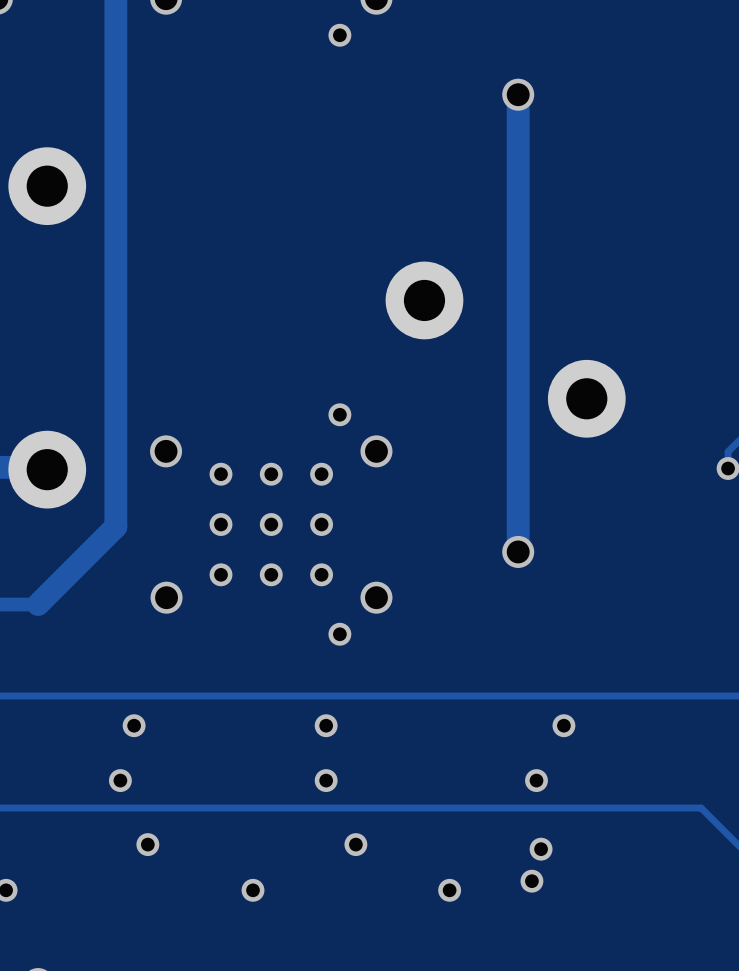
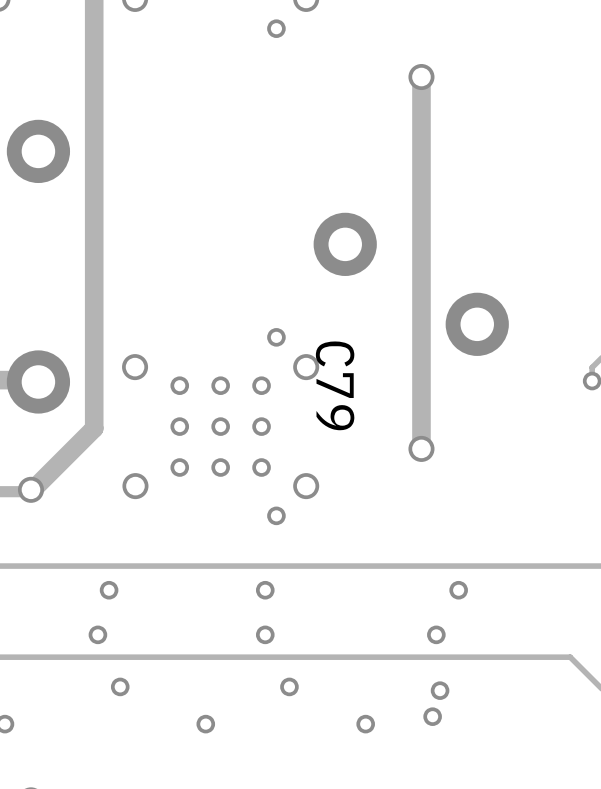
C79: none -> (335, 385)
via: none -> (30, 489)

